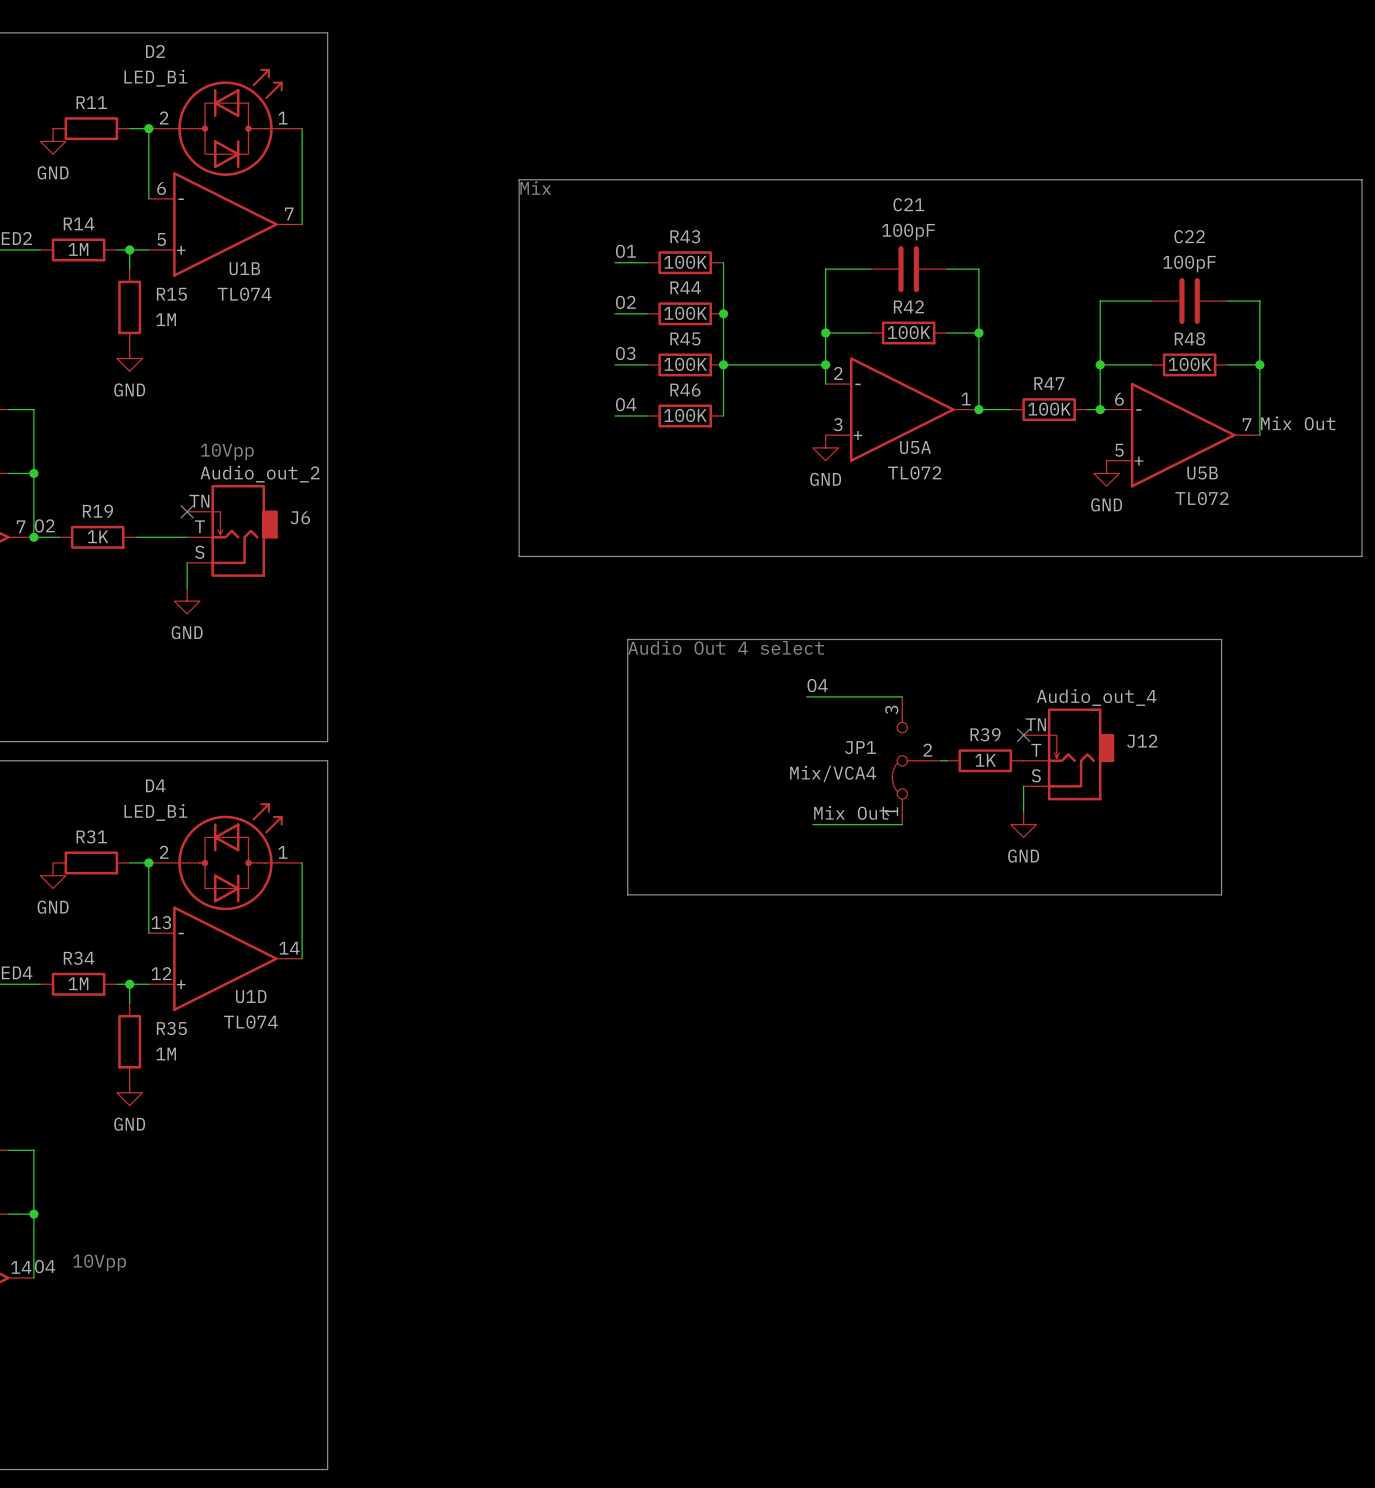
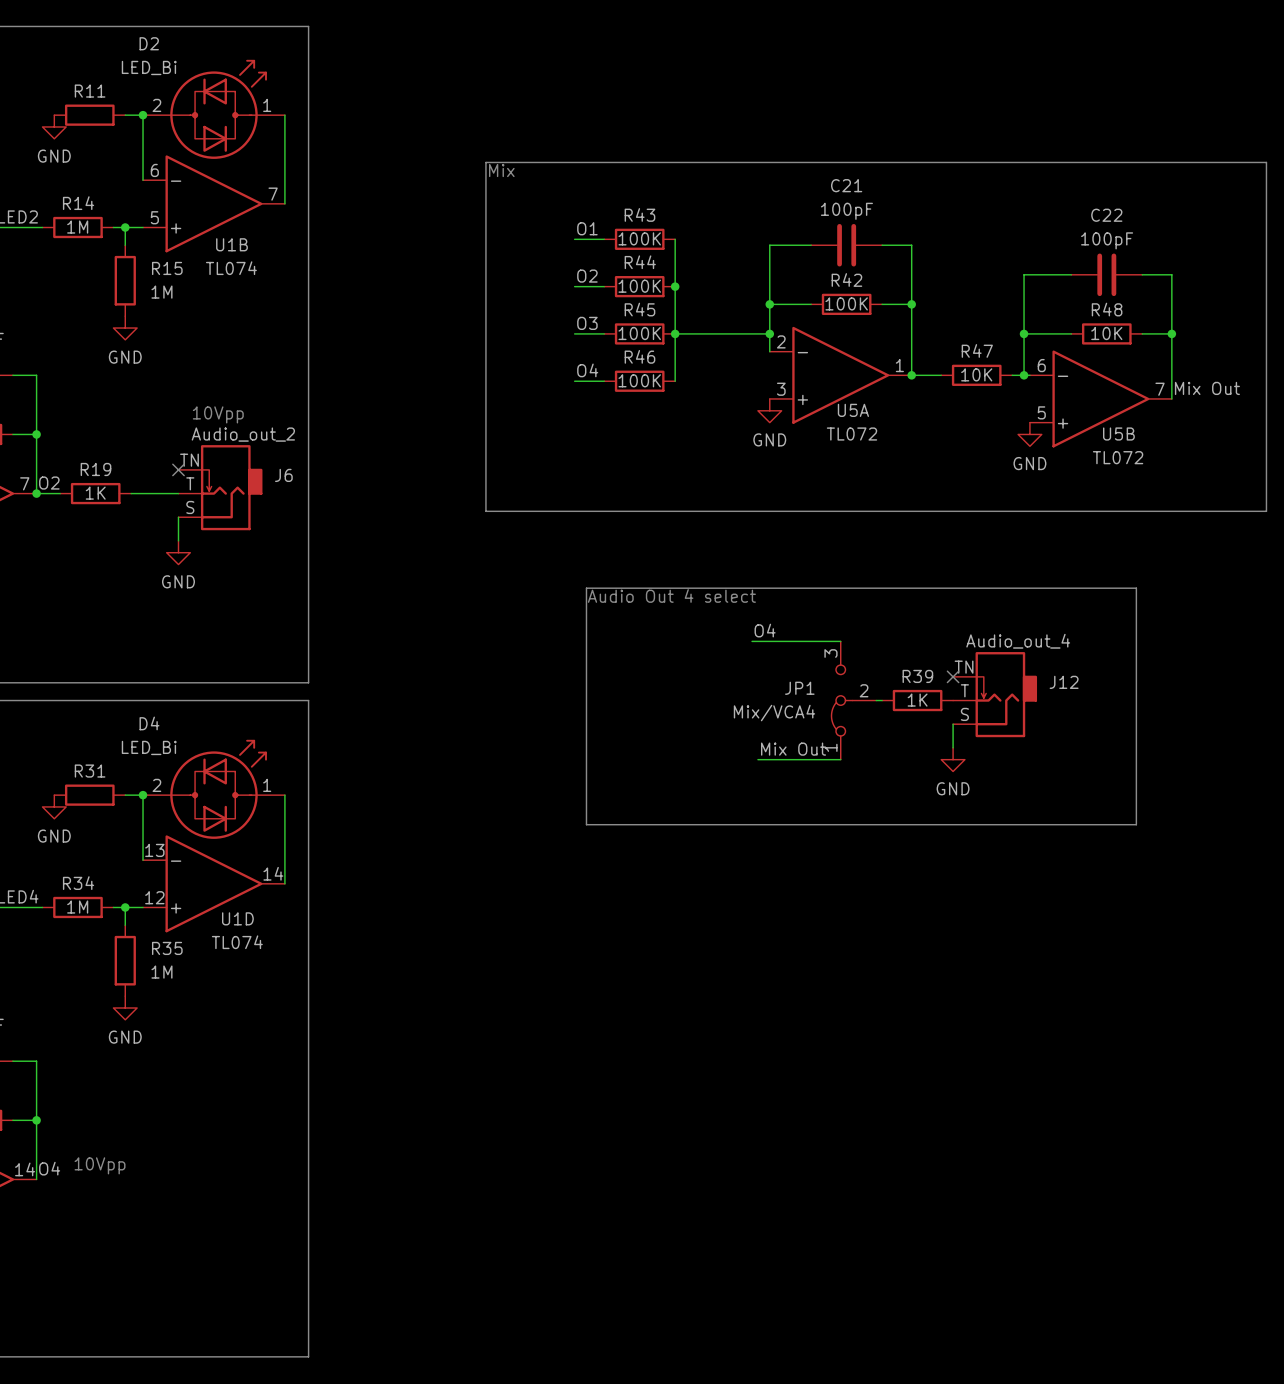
R48 value: 100K (1189, 364) -> 10K (1106, 333)
R47 value: 100K (1049, 409) -> 10K (976, 374)

